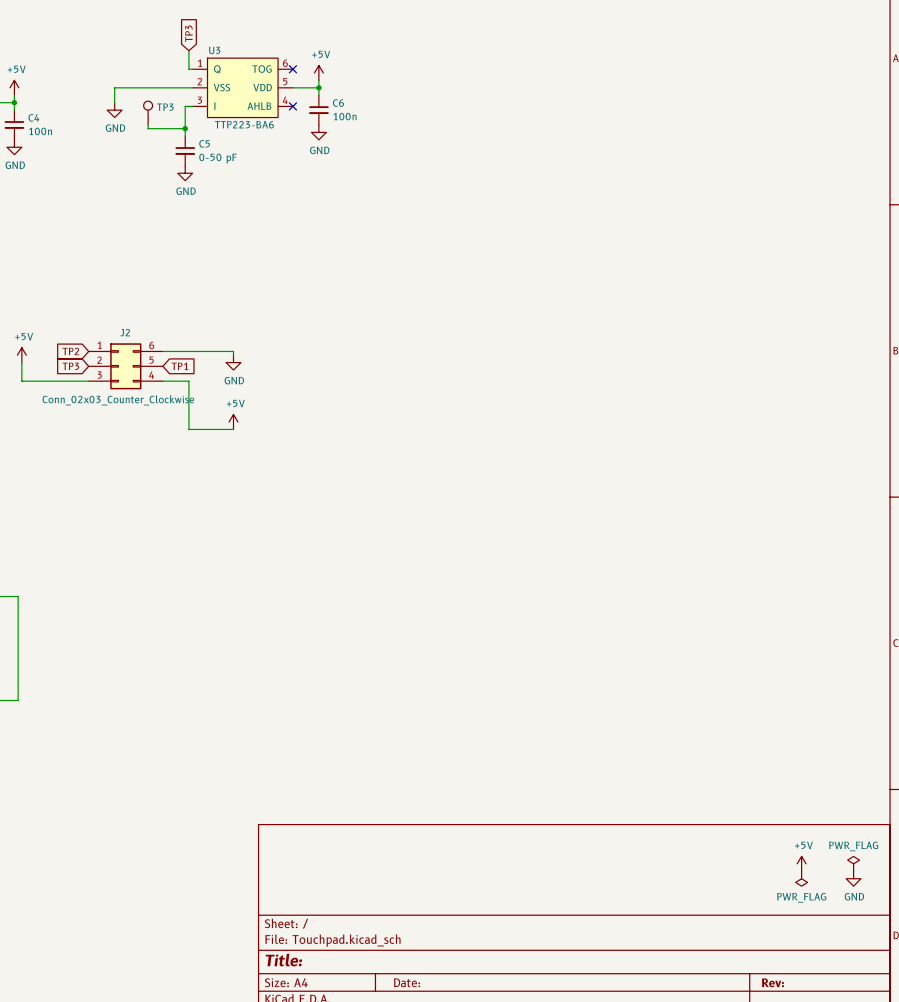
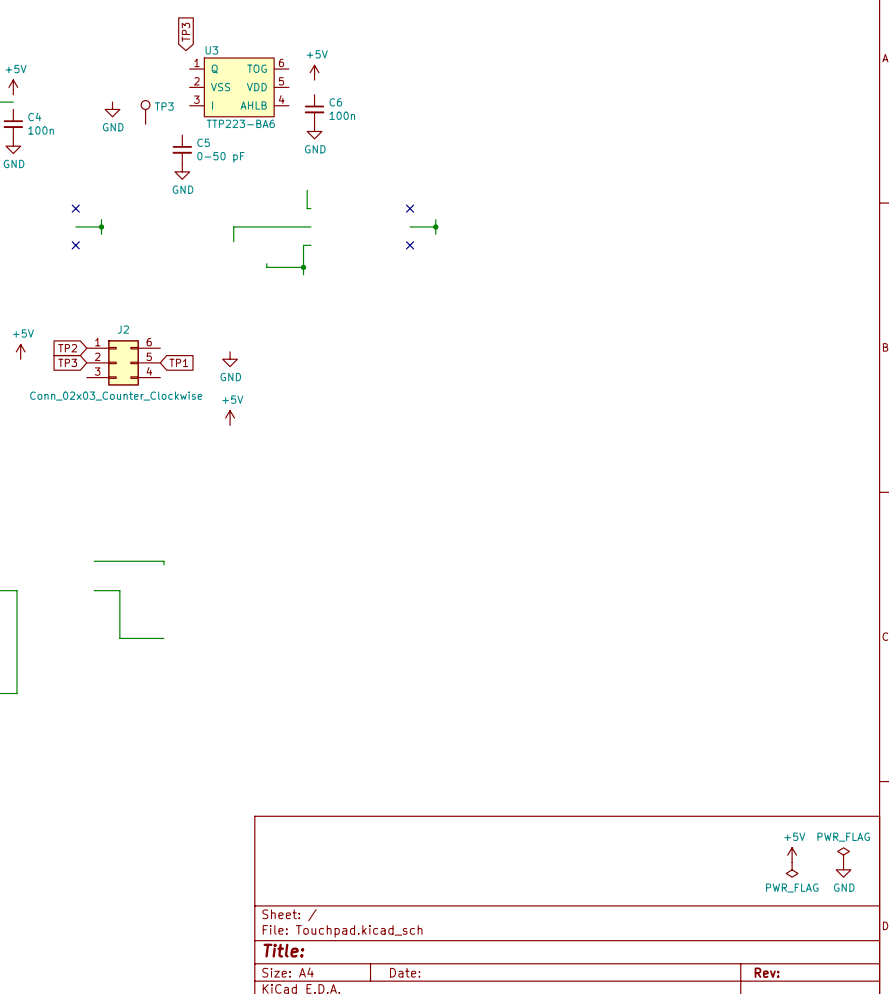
wire: (188, 50) (188, 69) (192, 69) -> none
no-connect mark: (292, 69) -> none
wire: (318, 80) (318, 95) -> none
wire: (192, 87) (114, 87) (114, 102) -> none
wire: (292, 87) (318, 87) -> none
junction: (318, 87) -> none
wire: (14, 95) (14, 110) -> none
junction: (14, 102) -> none
wire: (192, 106) (185, 106) (185, 136) -> none
no-connect mark: (292, 106) -> none
wire: (148, 124) (148, 128) (185, 128) -> none
junction: (185, 128) -> none
wire: none -> (307, 190) (307, 208) (310, 208)
no-connect mark: none -> (75, 208)
no-connect mark: none -> (410, 208)
wire: none -> (101, 219) (101, 234)
wire: none -> (435, 219) (435, 234)
wire: none -> (75, 226) (101, 226)
junction: none -> (101, 226)
wire: none -> (310, 226) (233, 226) (233, 241)
wire: none -> (410, 226) (435, 226)
junction: none -> (435, 226)
no-connect mark: none -> (75, 245)
wire: none -> (310, 245) (303, 245) (303, 274)
no-connect mark: none -> (410, 245)
wire: none -> (266, 263) (266, 267) (303, 267)
junction: none -> (303, 267)
wire: (162, 351) (233, 351) (233, 355) -> none
wire: (21, 362) (21, 381) (88, 381) -> none
wire: (162, 381) (188, 381) (188, 429) (233, 429) -> none
wire: none -> (94, 561) (163, 561) (163, 564)
wire: none -> (94, 590) (119, 590) (119, 638) (163, 638)

